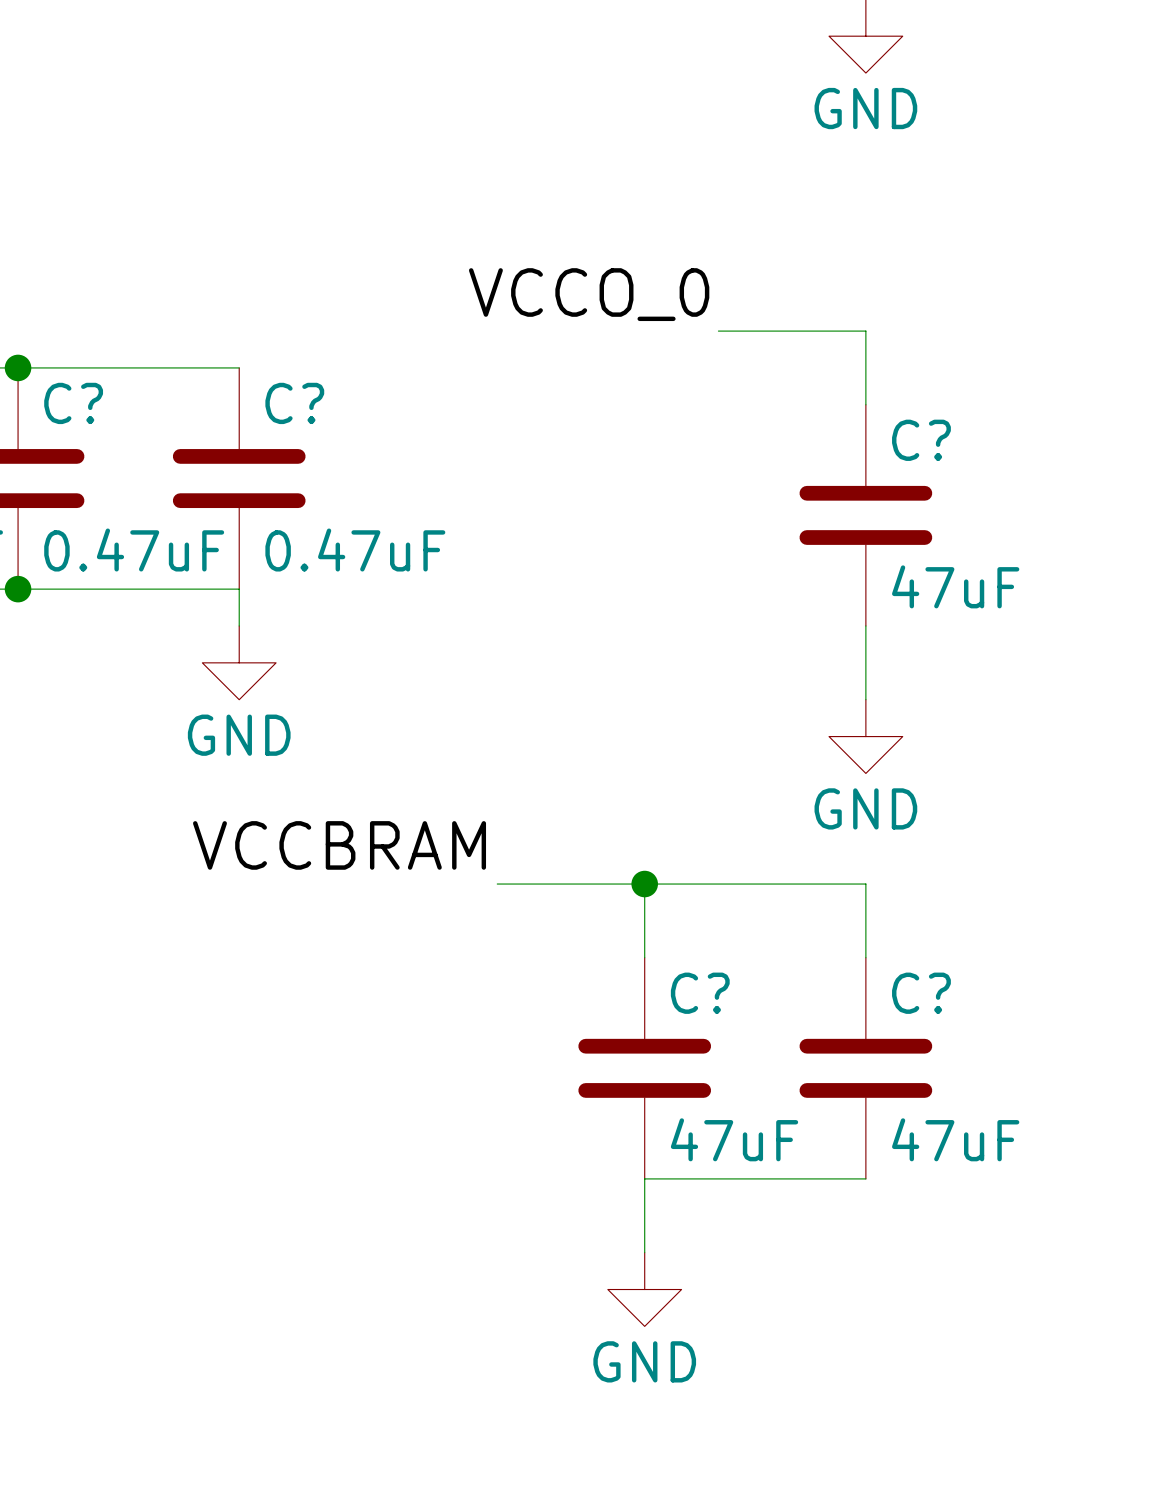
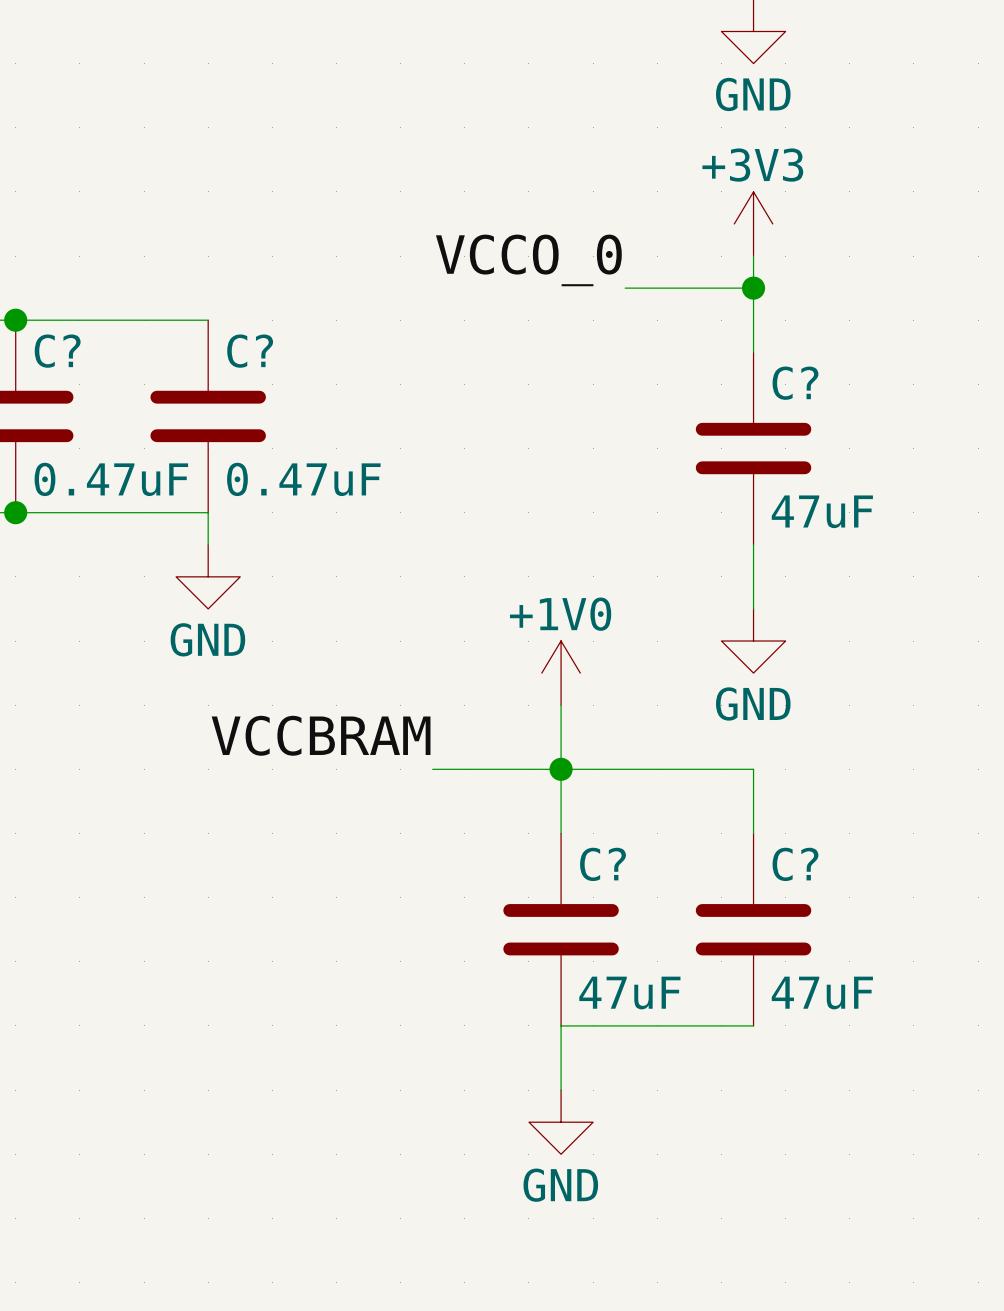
power symbol: none -> +3V3 (753, 223)
wire: none -> (753, 256) (753, 288)
junction: none -> (753, 288)
power symbol: none -> +1V0 (561, 673)
wire: none -> (561, 705) (561, 769)

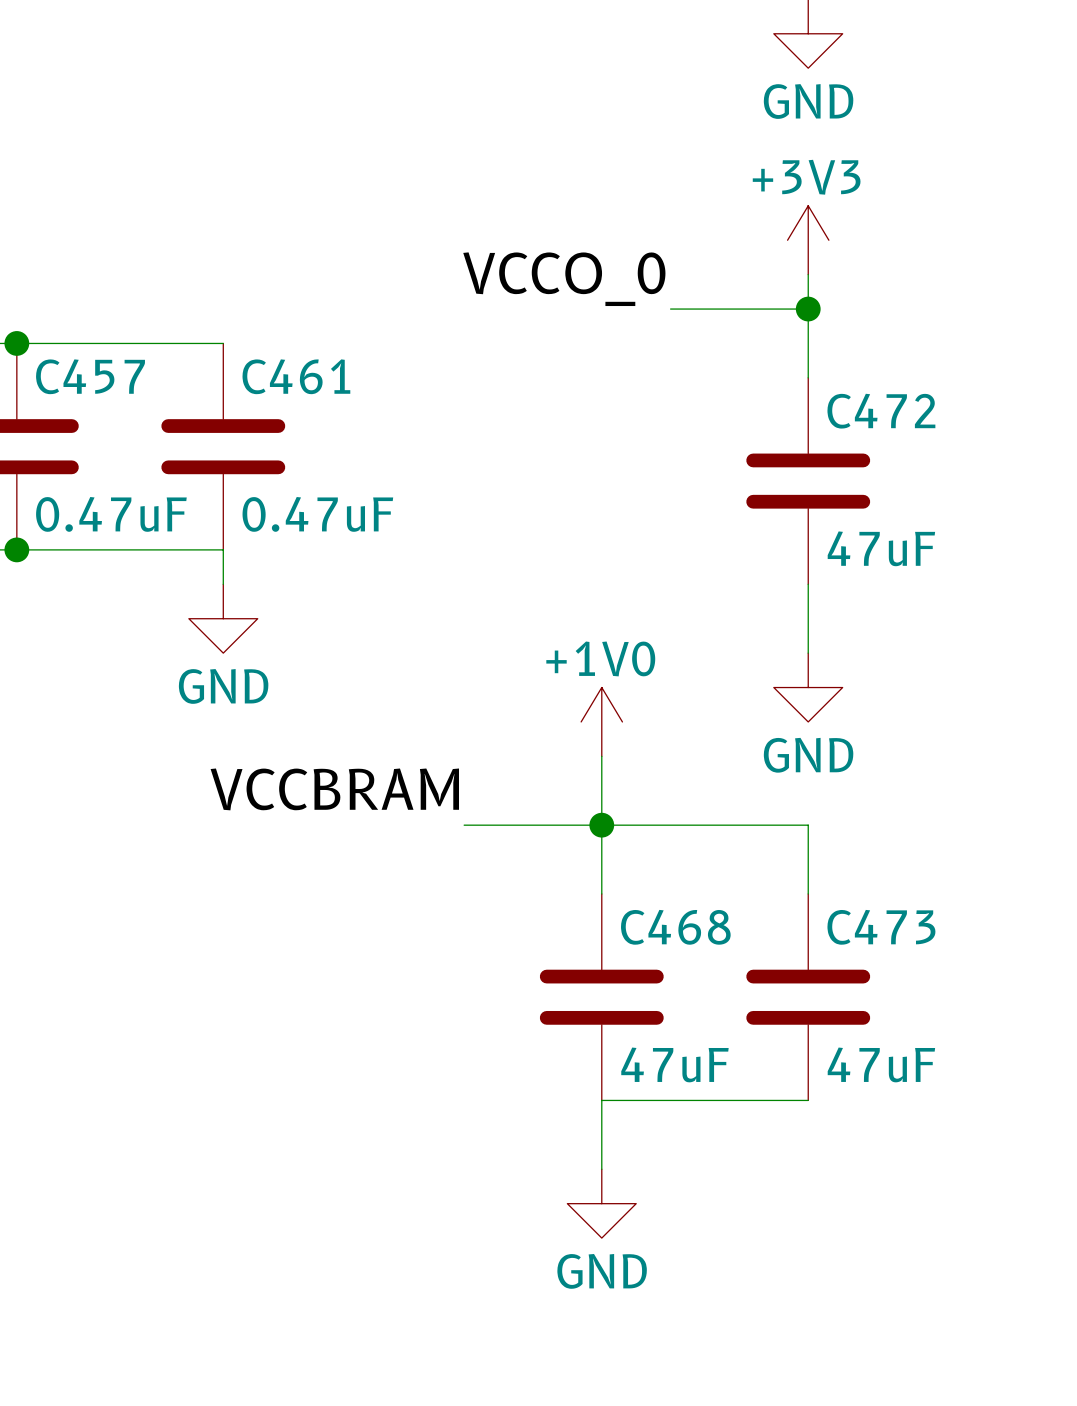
C? name: C? (57, 351) -> C457 (90, 376)
C? name: C? (250, 351) -> C461 (296, 376)
C? name: C? (795, 383) -> C472 (881, 411)
C? name: C? (603, 864) -> C468 (675, 927)
C? name: C? (795, 864) -> C473 (881, 927)

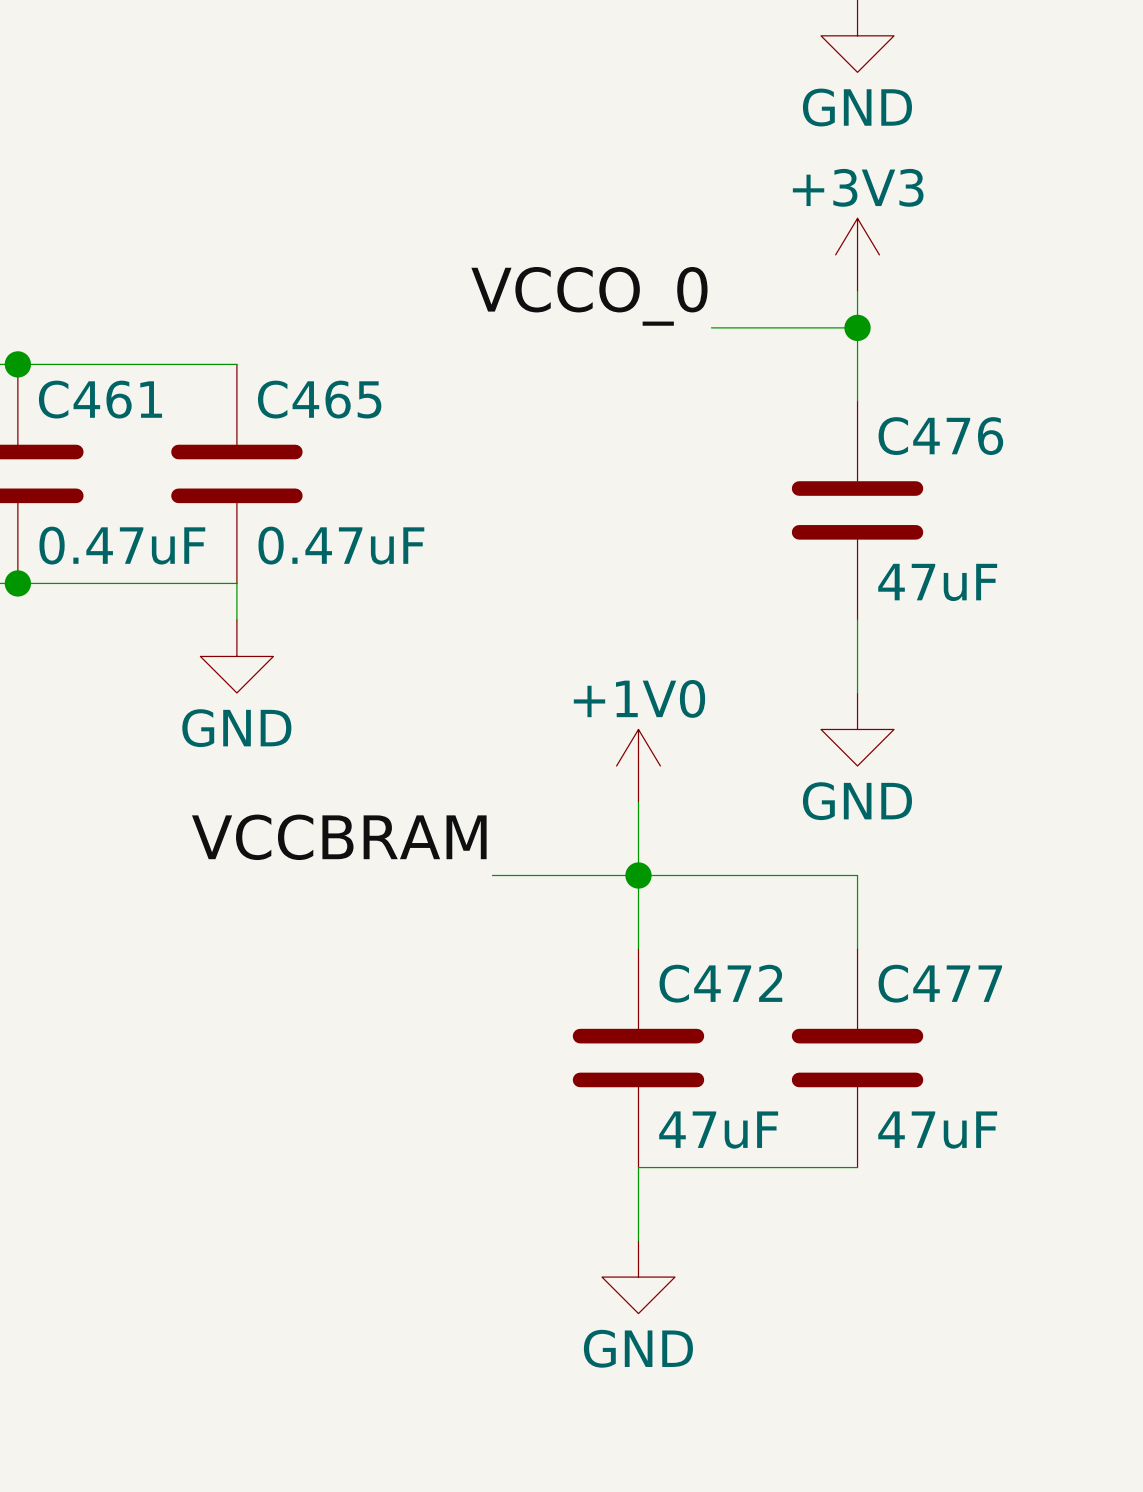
C457 name: C457 (90, 376) -> C461 (100, 399)
C461 name: C461 (296, 376) -> C465 (319, 399)
C472 name: C472 (881, 411) -> C476 (940, 436)
C468 name: C468 (675, 927) -> C472 (720, 983)
C473 name: C473 (881, 927) -> C477 (940, 983)

